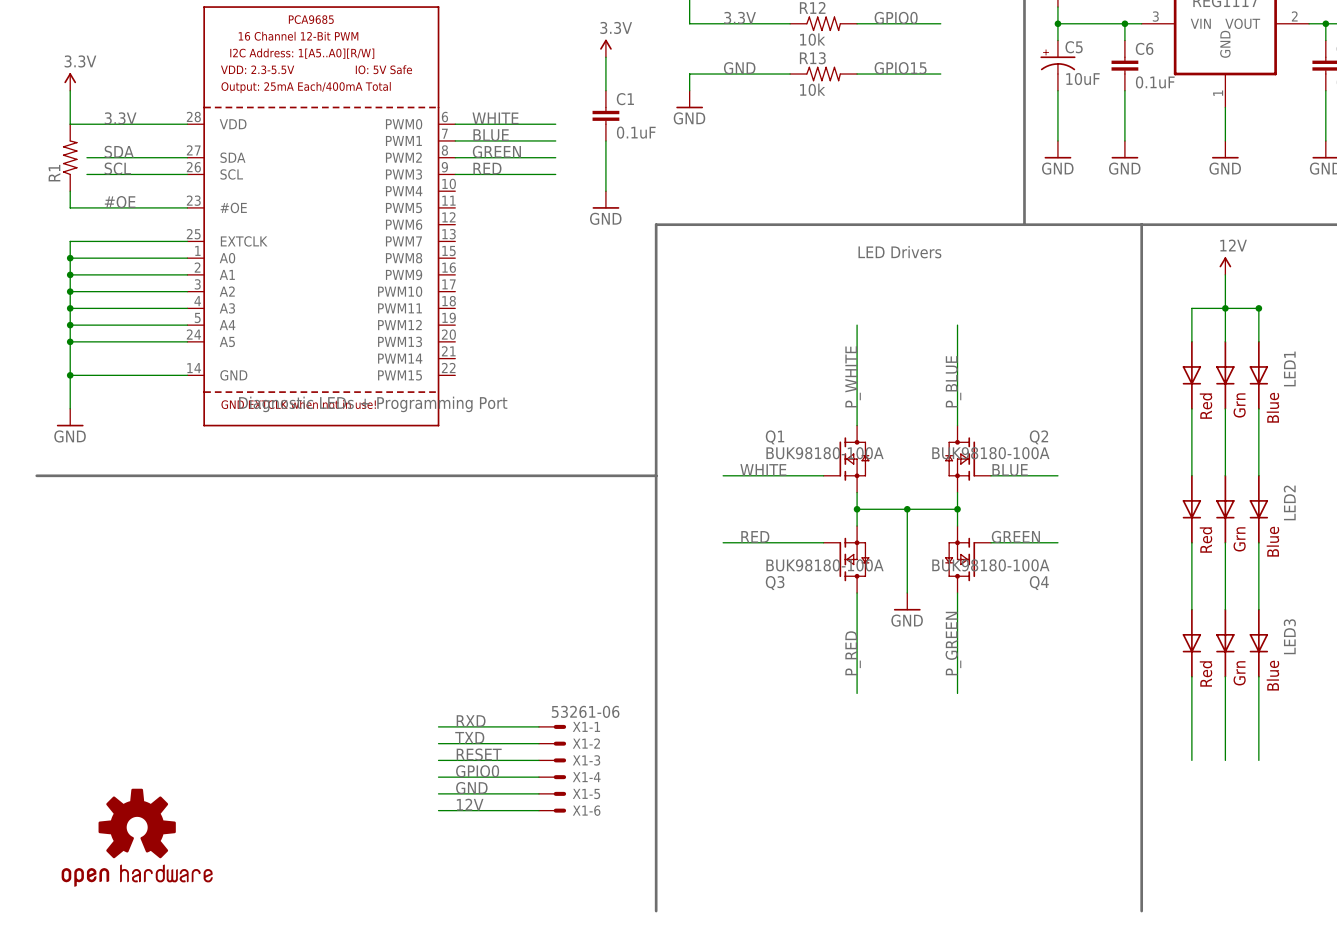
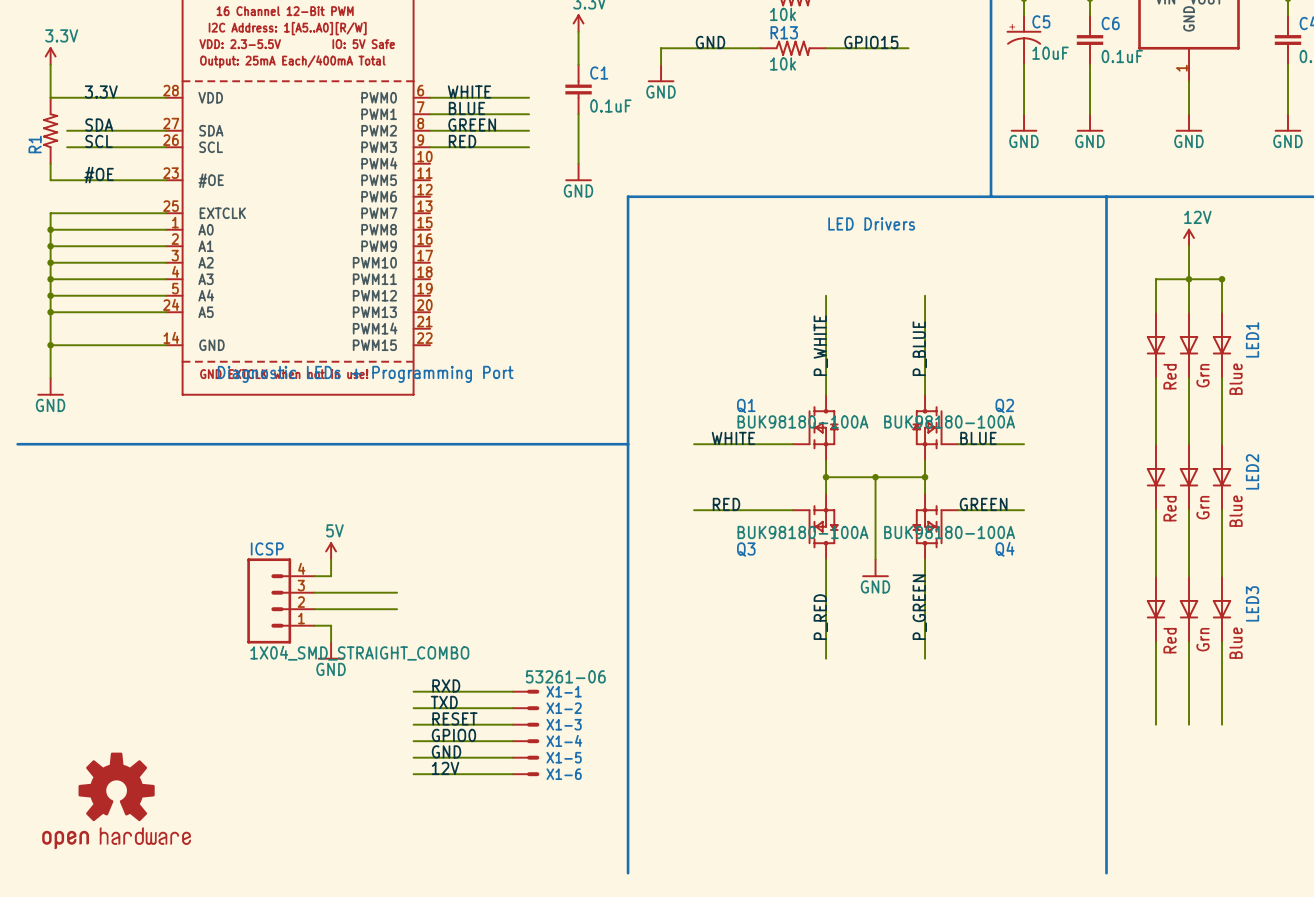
power symbol: none -> 5V (331, 551)
wire: none -> (331, 559) (331, 576) (314, 576)
wire: none -> (314, 592) (397, 592)
ICSP: none -> 1X04_SMD_STRAIGHT_COMBO (280, 600)
wire: none -> (314, 609) (397, 609)
wire: none -> (314, 625) (331, 625) (331, 642)
power symbol: none -> GND (331, 650)

